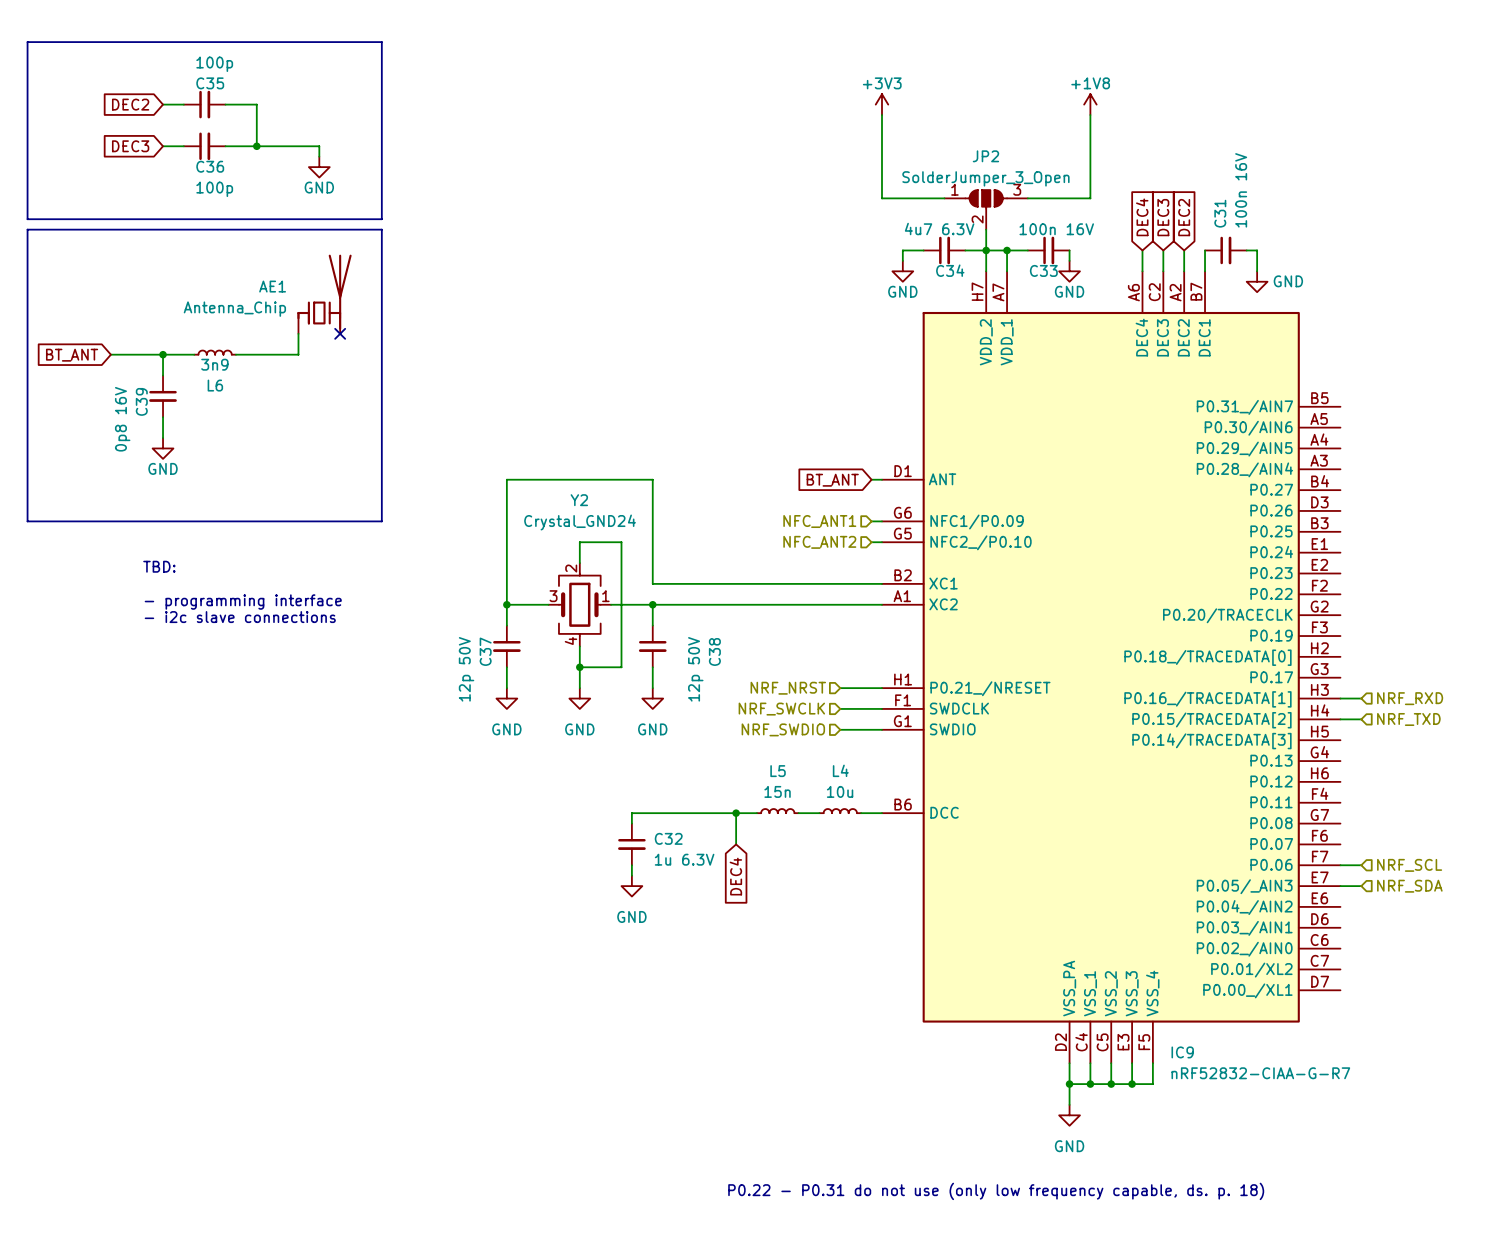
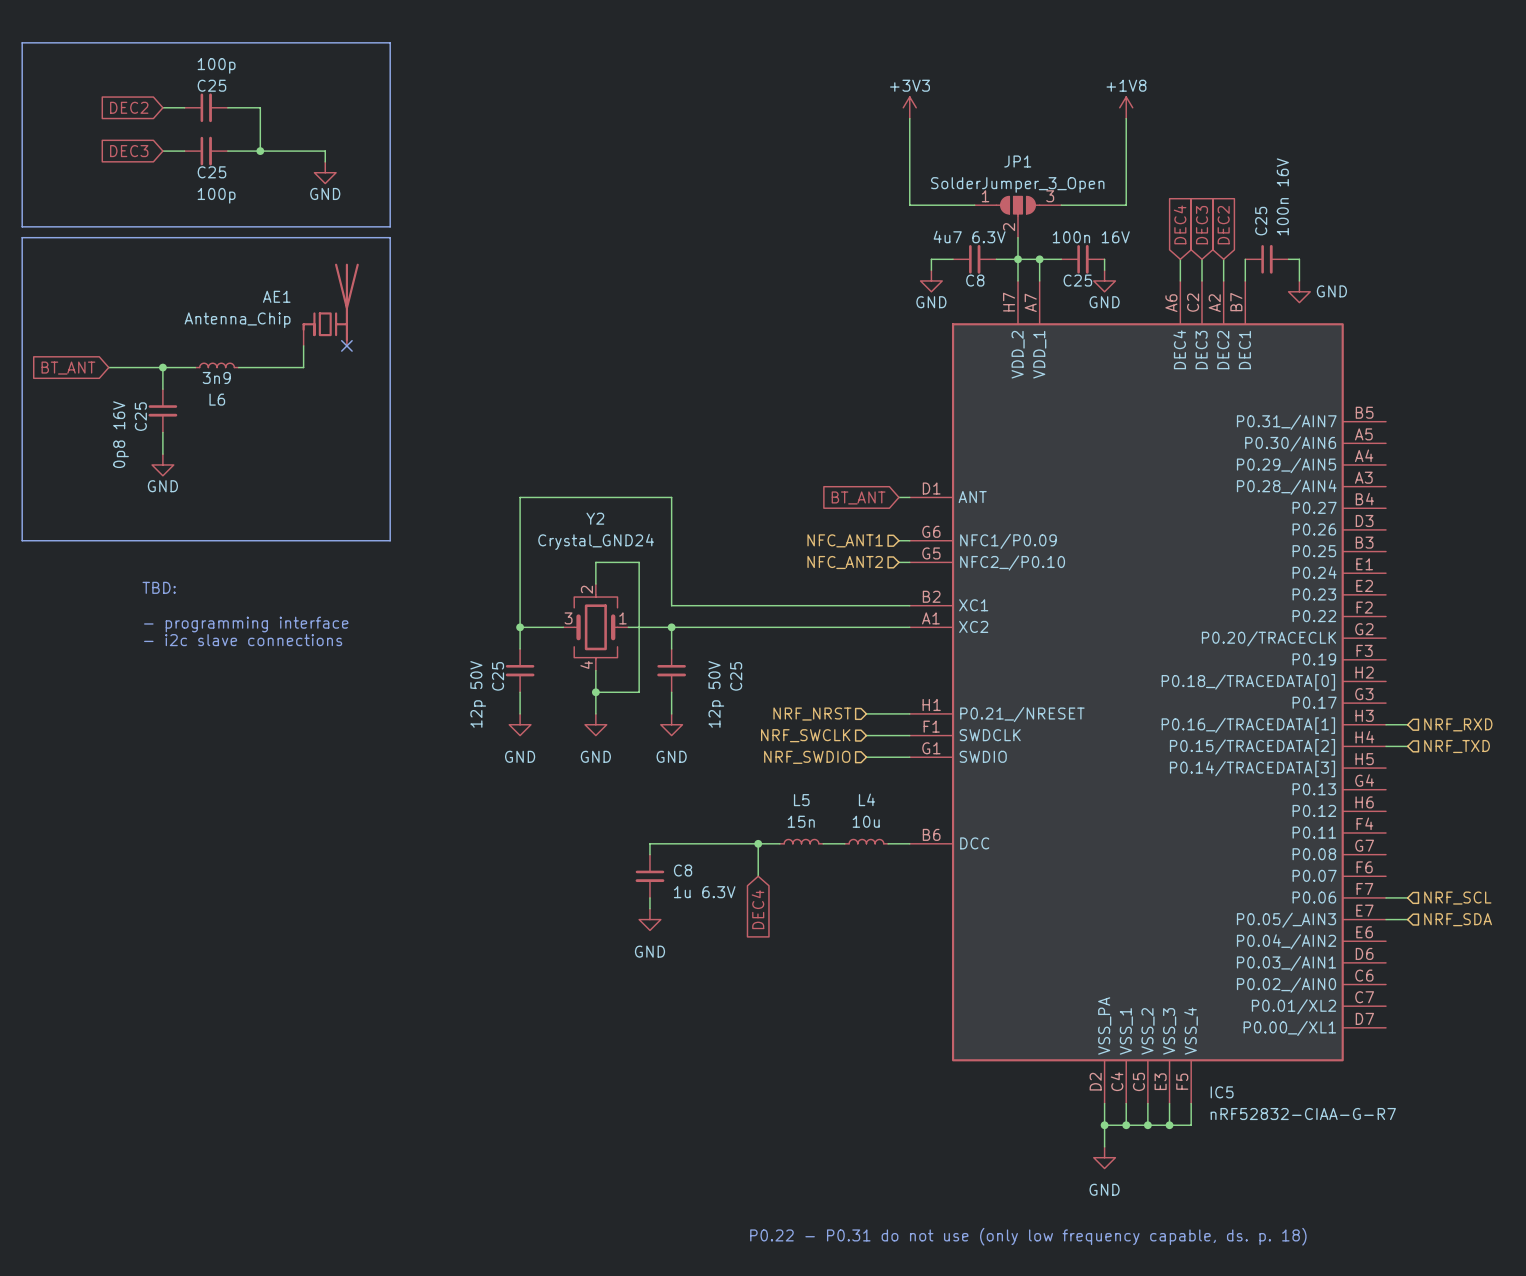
C35 name: C35 (210, 83) -> C25 (211, 85)
JP2 name: JP2 (985, 156) -> JP1 (1017, 161)
C36 name: C36 (210, 166) -> C25 (211, 172)
C31 name: C31 (1220, 213) -> C25 (1261, 221)
C34 name: C34 (950, 270) -> C8 (975, 280)
C33 name: C33 (1043, 270) -> C25 (1077, 280)
C39 name: C39 (141, 401) -> C25 (140, 416)
C37 name: C37 (485, 651) -> C25 (498, 676)
C38 name: C38 (714, 651) -> C25 (736, 676)
C32 name: C32 (668, 838) -> C8 (683, 870)
IC9 name: IC9 (1182, 1052) -> IC5 (1222, 1092)

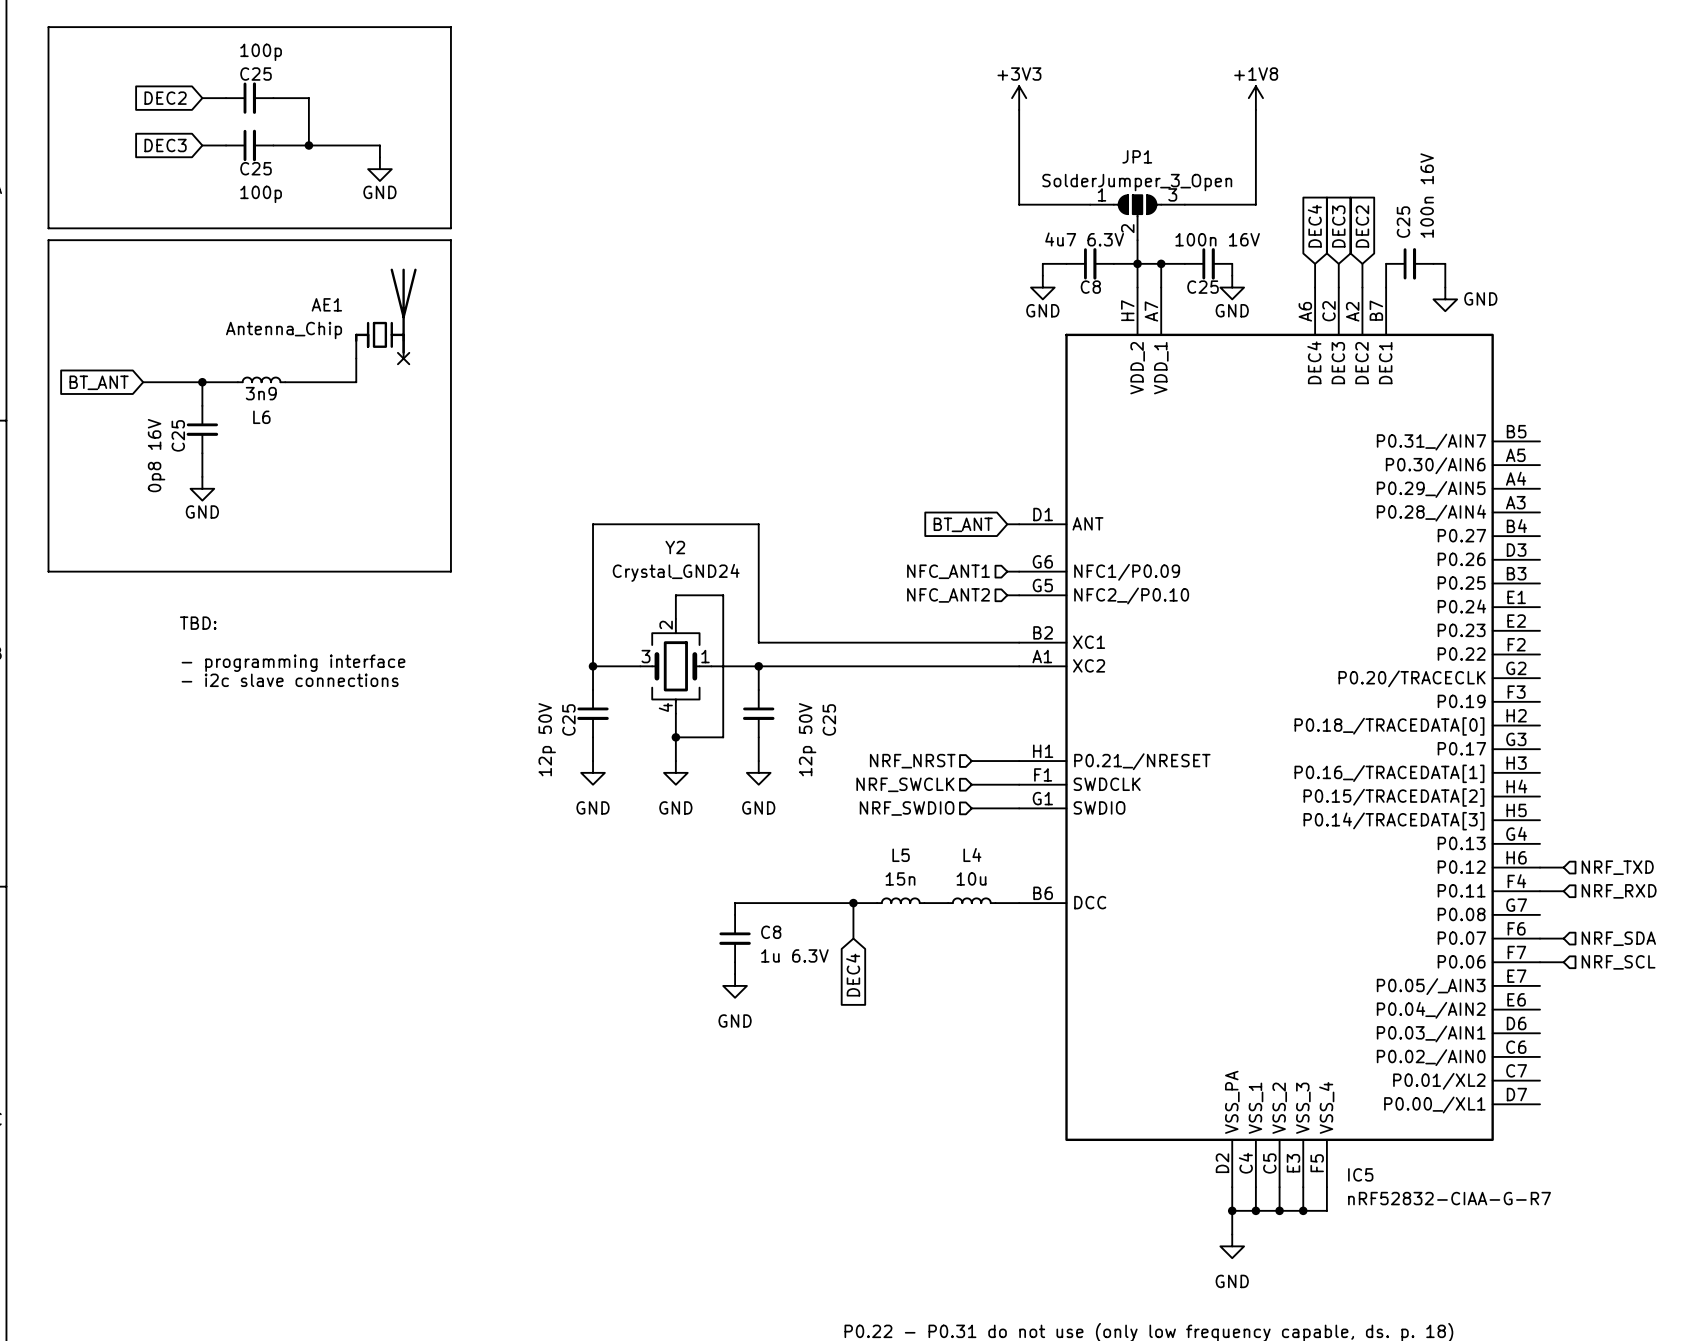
wire: (1386, 724) (1407, 724) -> (1540, 891) (1563, 891)
hierarchical label position: NRF_RXD (1458, 724) -> NRF_RXD (1619, 891)
wire: (1386, 746) (1407, 746) -> (1540, 867) (1563, 867)
hierarchical label position: NRF_TXD (1457, 746) -> NRF_TXD (1617, 867)
wire: (1386, 919) (1407, 919) -> (1540, 938) (1563, 938)
hierarchical label position: NRF_SDA (1458, 919) -> NRF_SDA (1618, 938)

